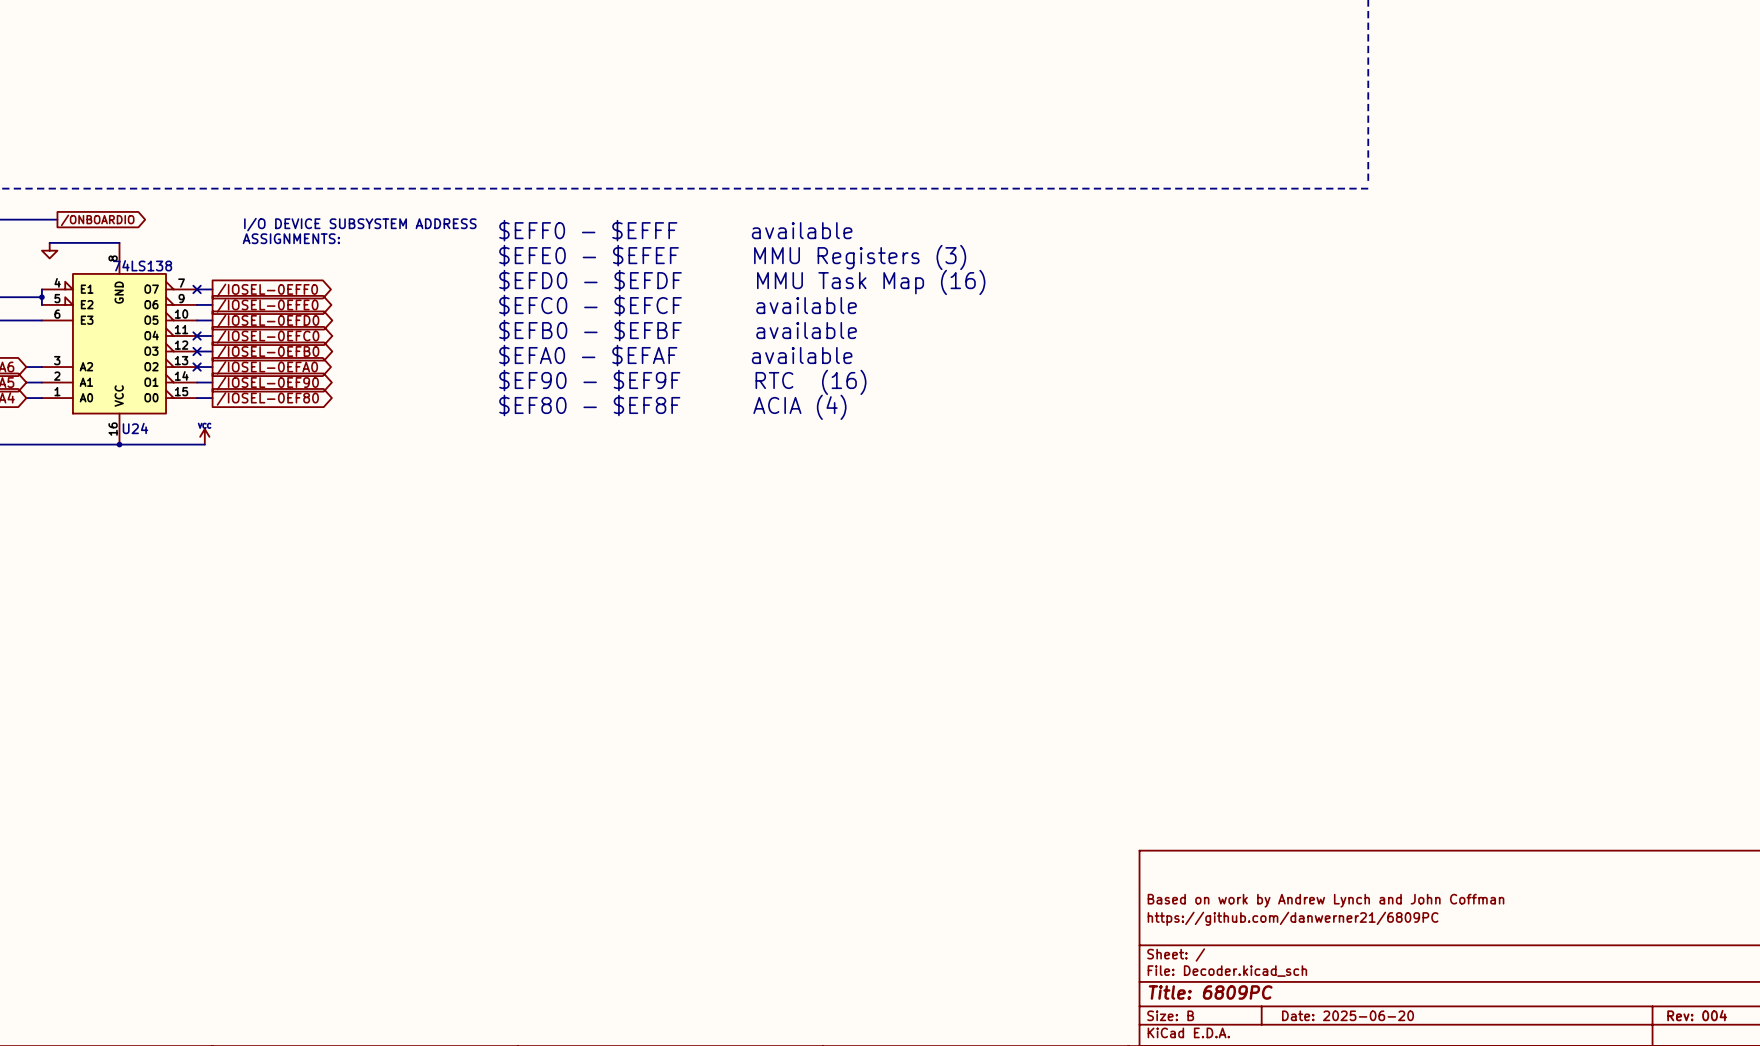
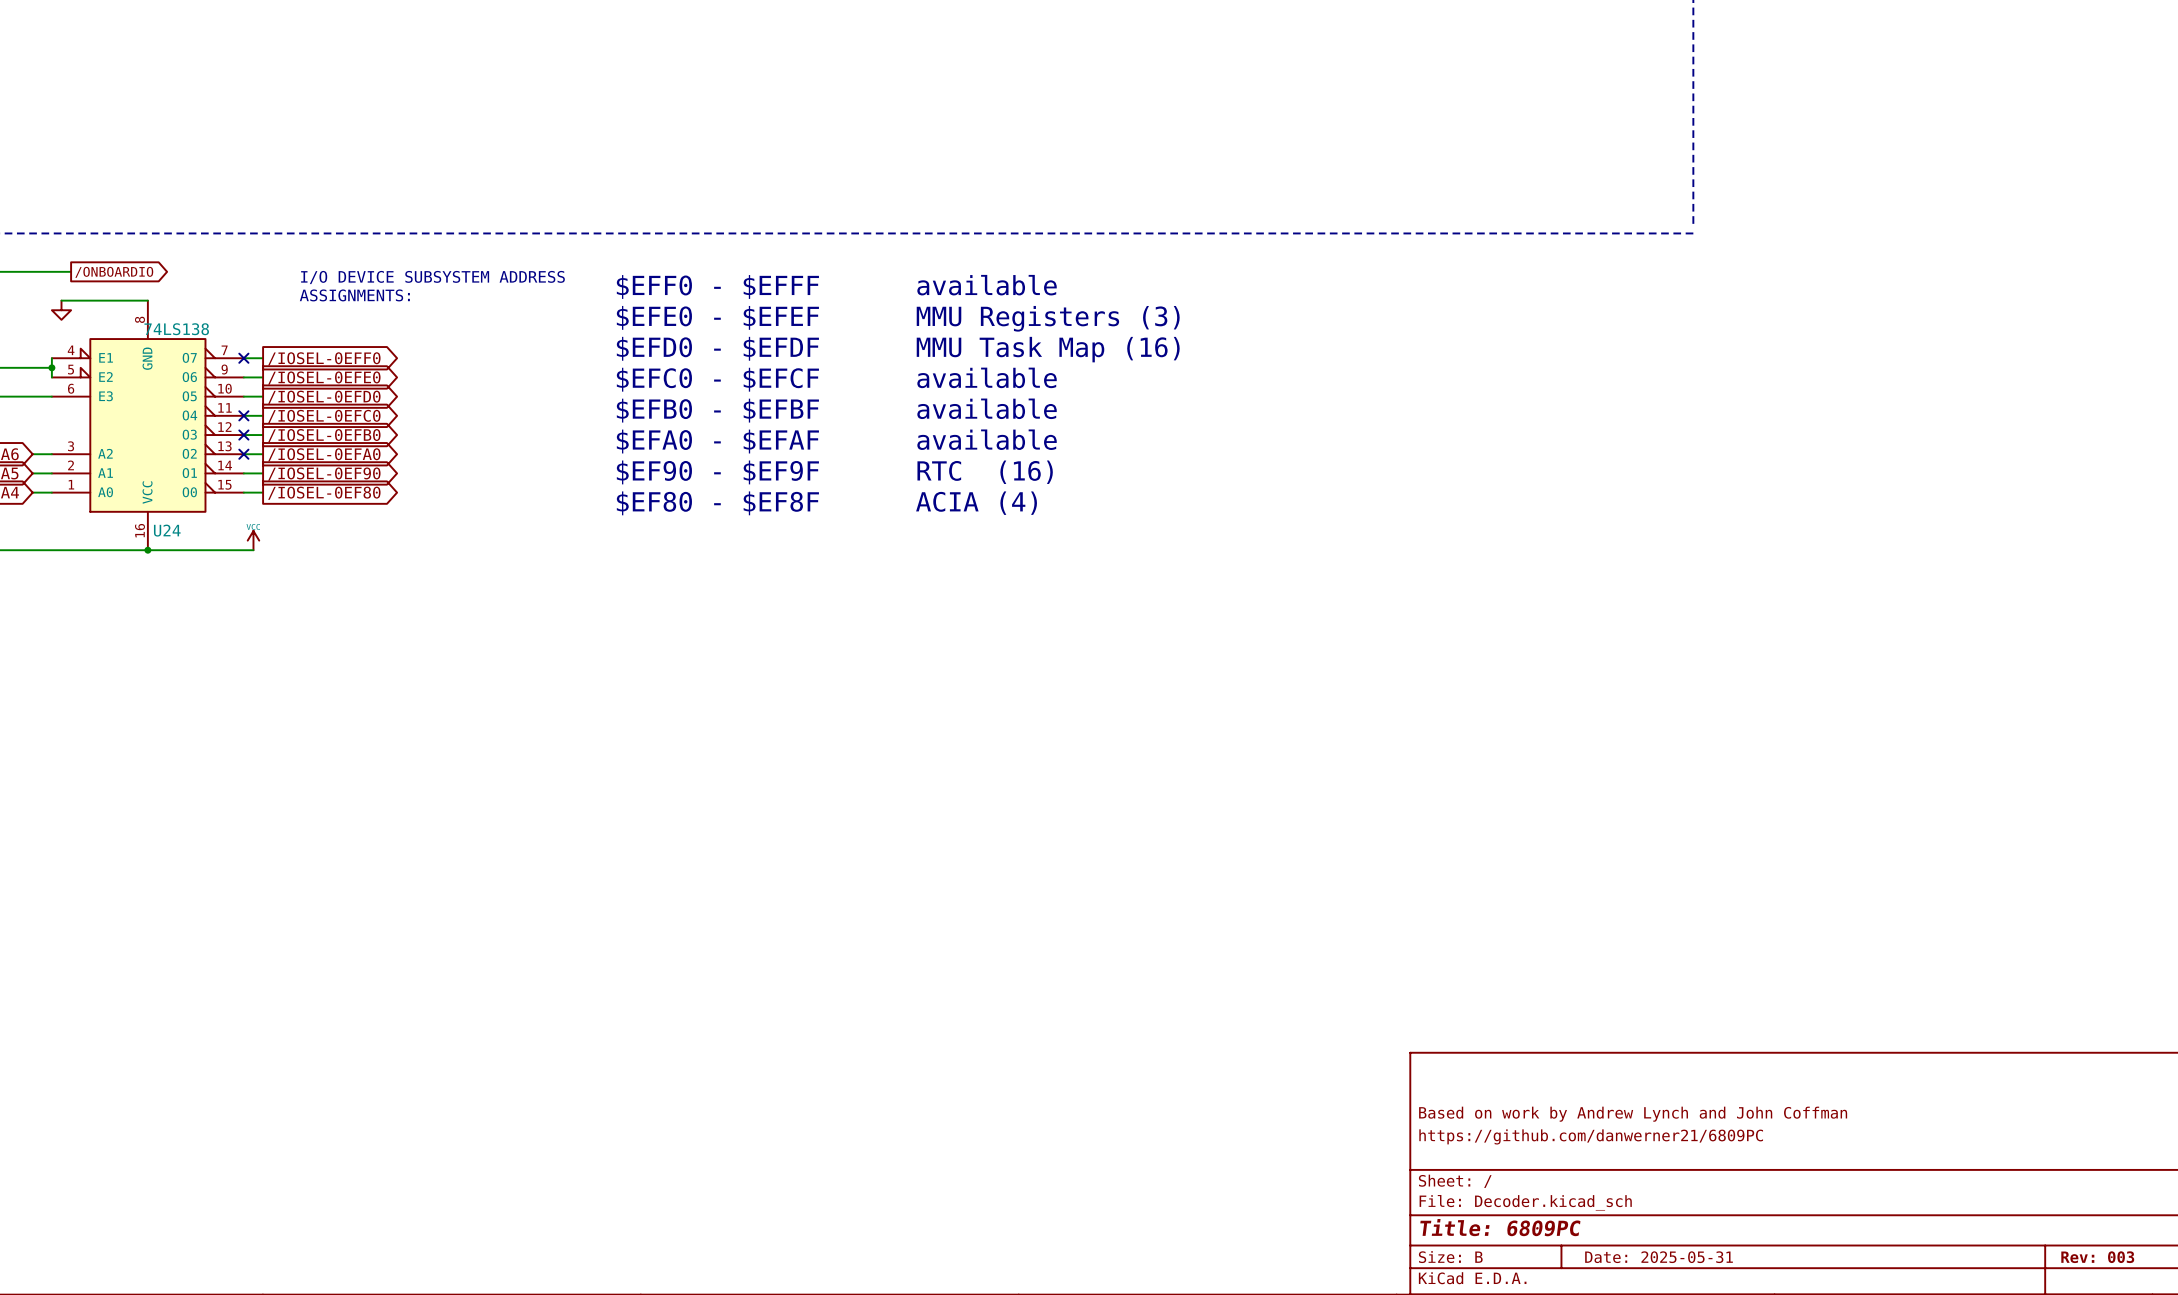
title block: Date: 2025-06-20 (1348, 1015) -> Date: 2025-05-31 (1659, 1257)
title block: Rev: 004 (1697, 1015) -> Rev: 003 (2097, 1257)

